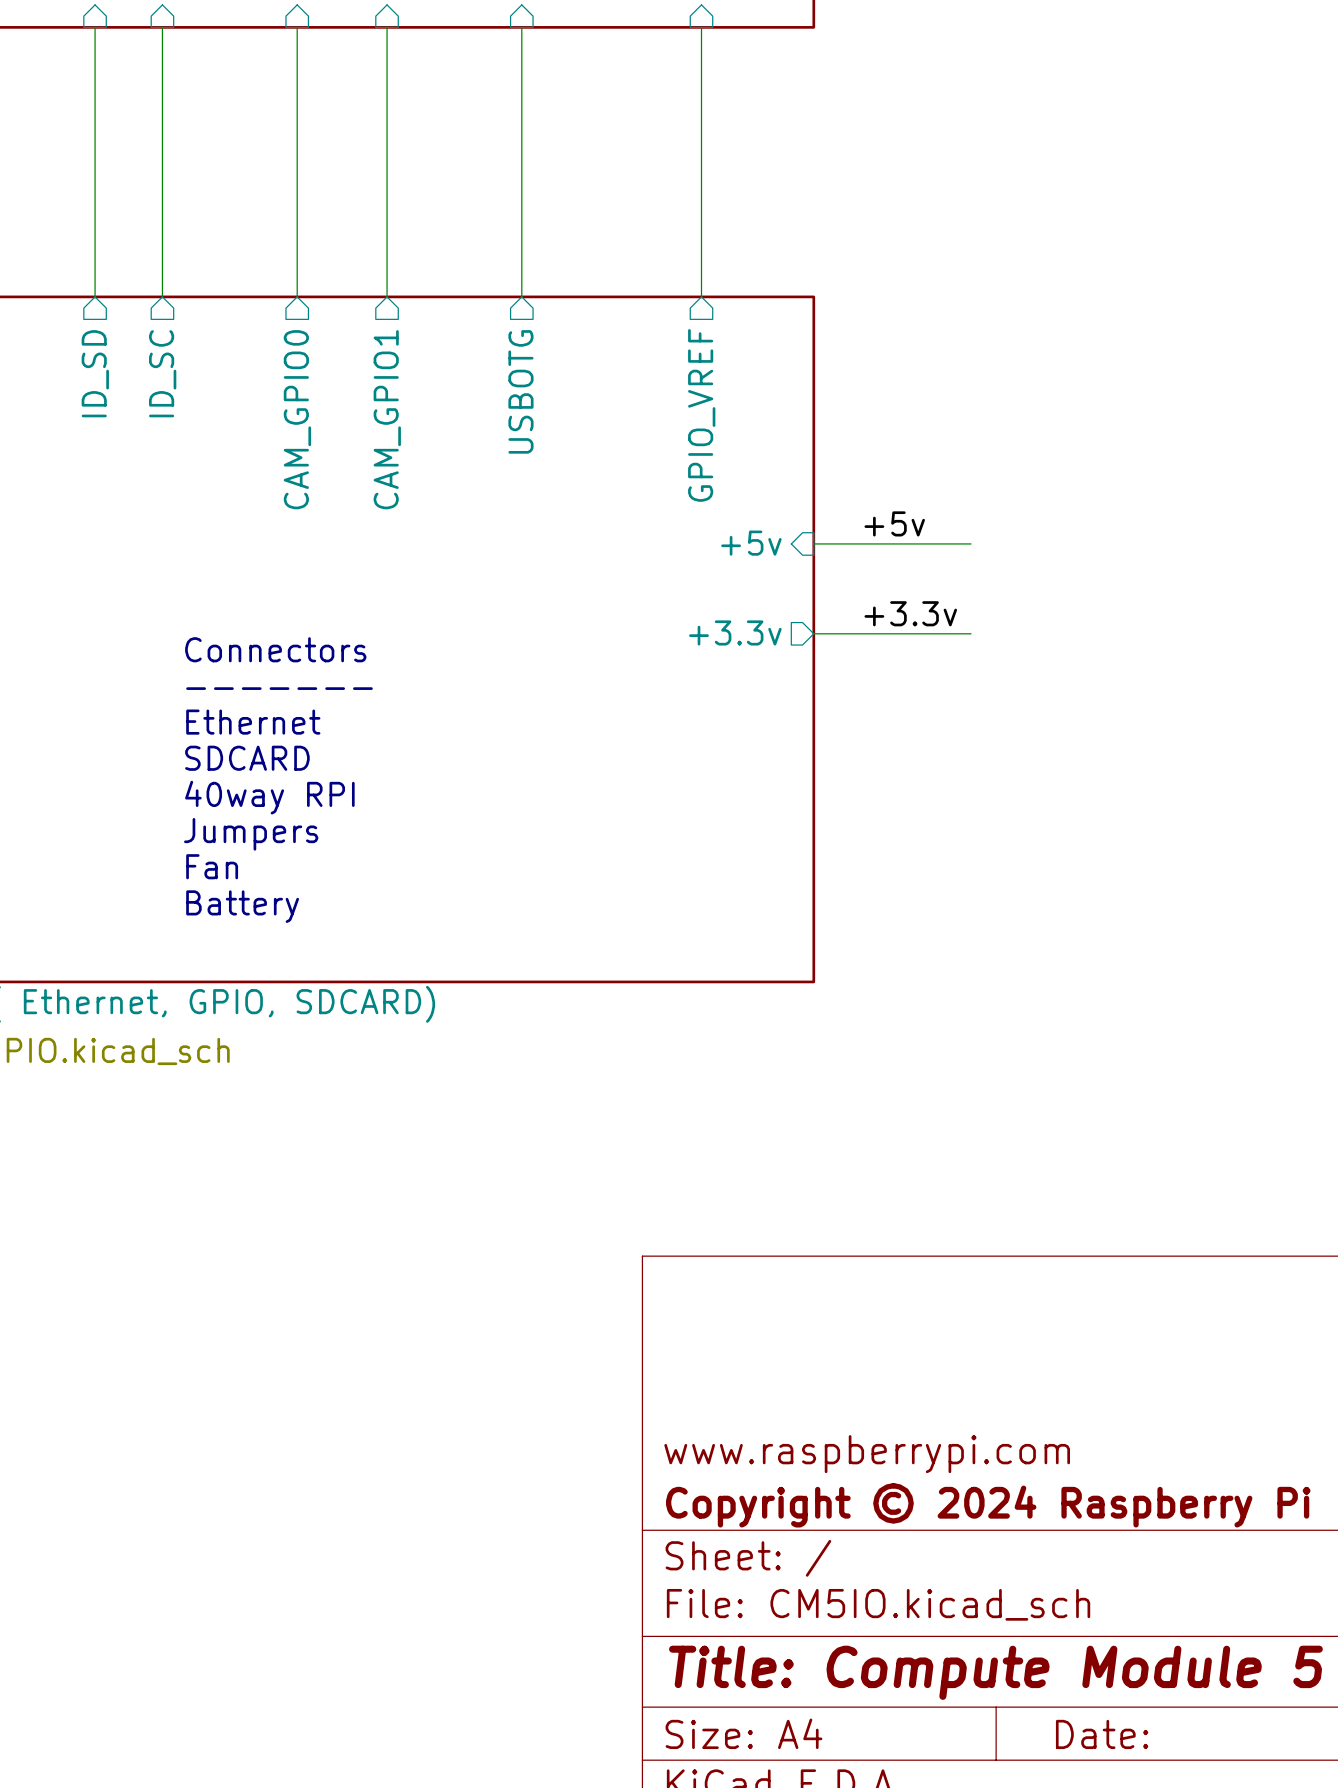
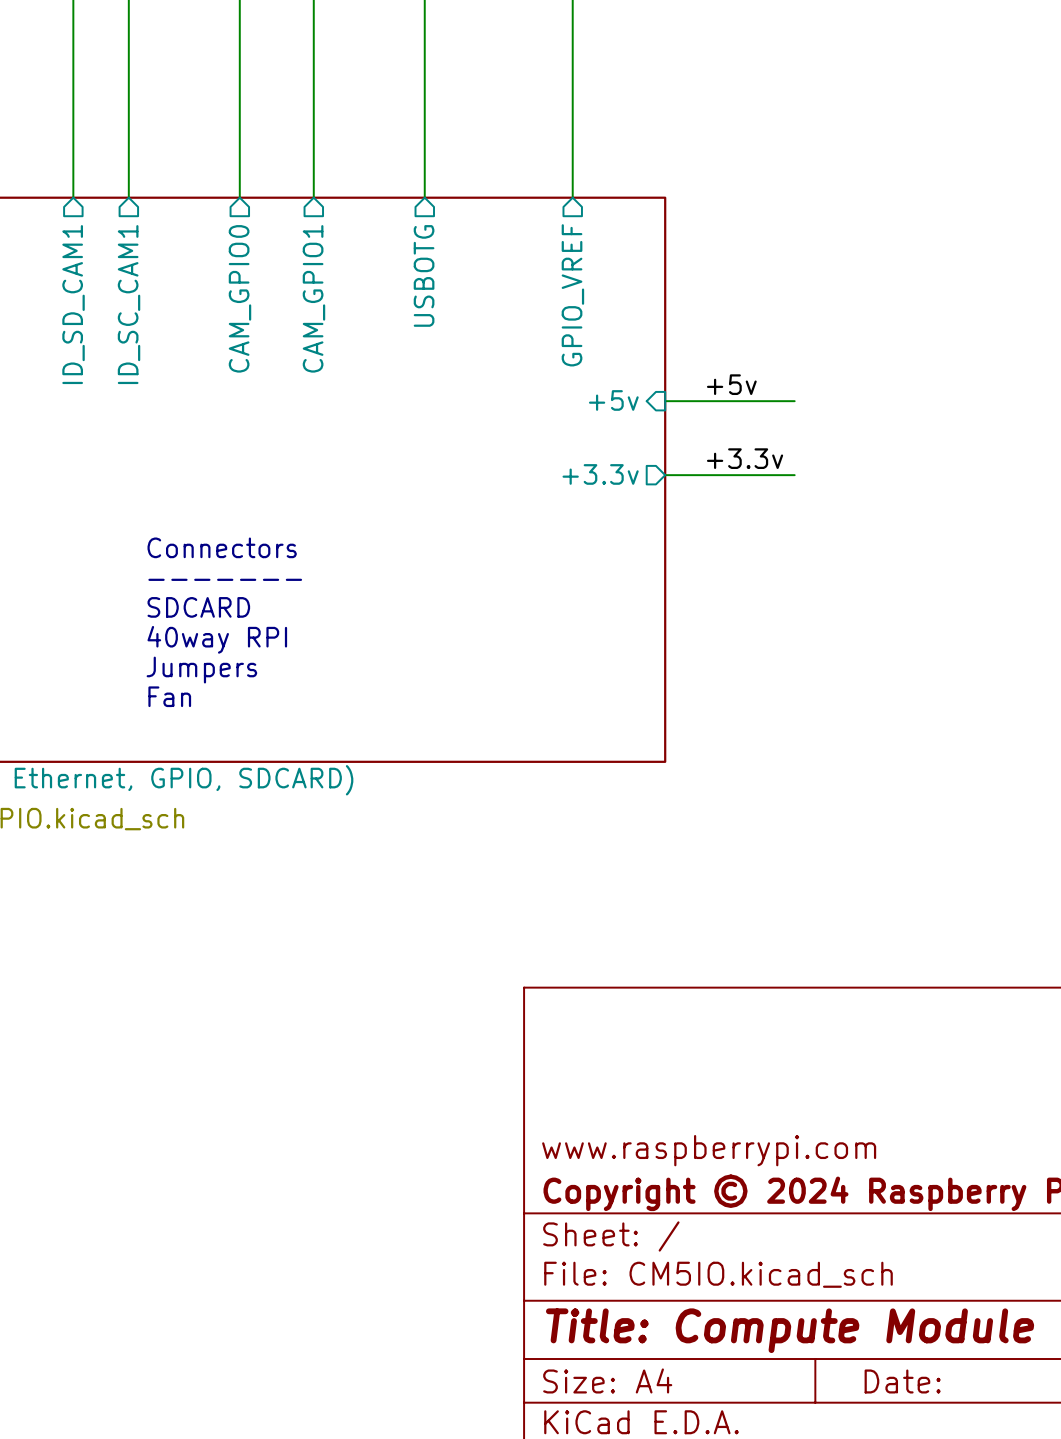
sheet pin: ID_SD (95, 373) -> ID_SD_CAM1 (73, 304)
sheet pin: ID_SC (162, 373) -> ID_SC_CAM1 (129, 304)
text: Connectors (275, 649) -> none
text: ------- (279, 688) -> none
text: Ethernet (253, 722) -> Connectors (222, 547)
text: SDCARD (247, 758) -> ------- (225, 579)
text: 40way RPI (269, 797) -> SDCARD (198, 607)
text: Jumpers (251, 834) -> 40way RPI (217, 639)
text: Fan (212, 866) -> Jumpers (201, 670)
text: Battery (242, 906) -> Fan (169, 696)

